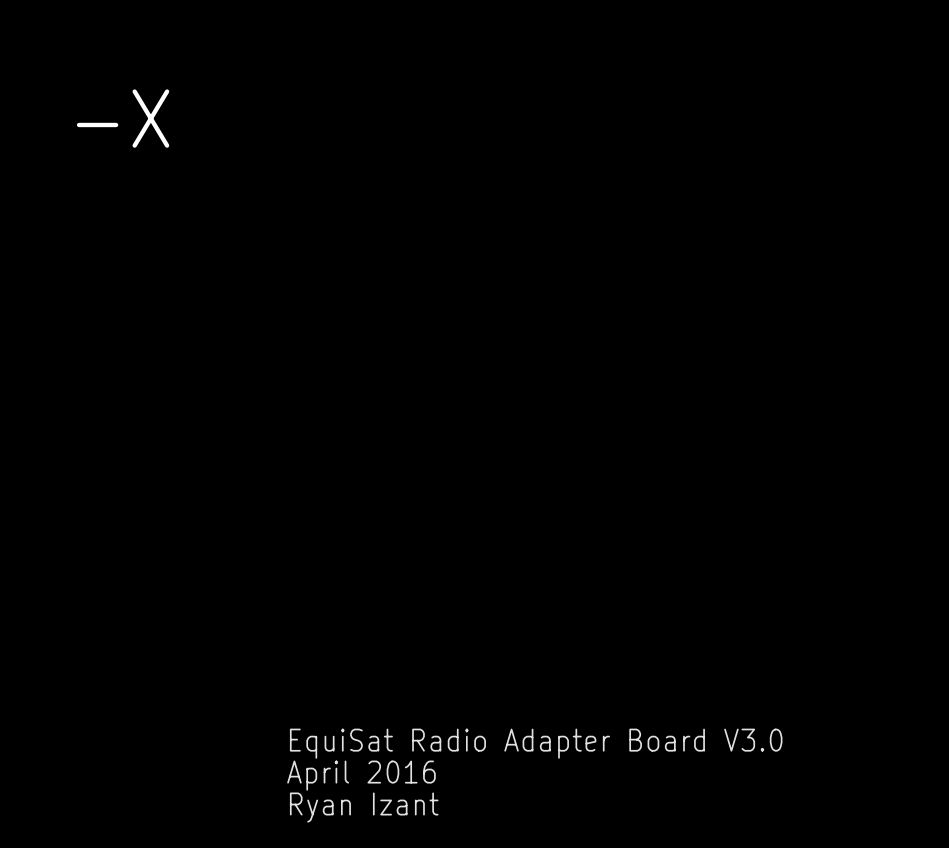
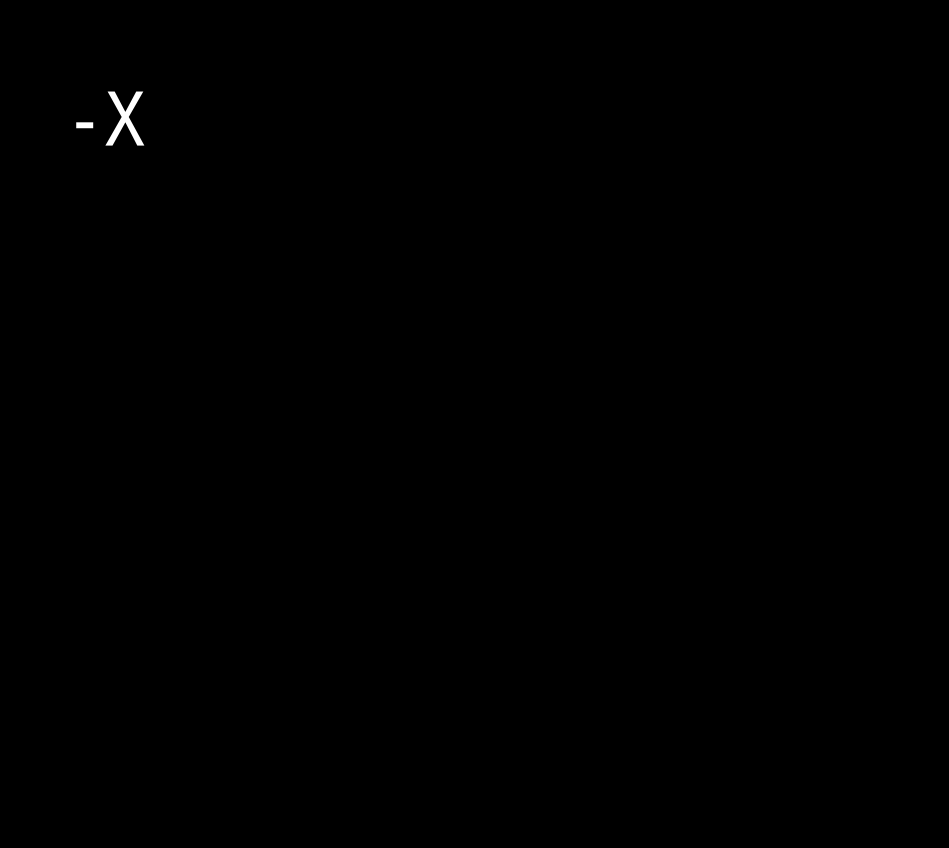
text: EquiSat Radio Adapter Board V3.0 (536, 743) -> none
text: April 2016 (361, 775) -> none
text: Ryan Izant (364, 807) -> none

